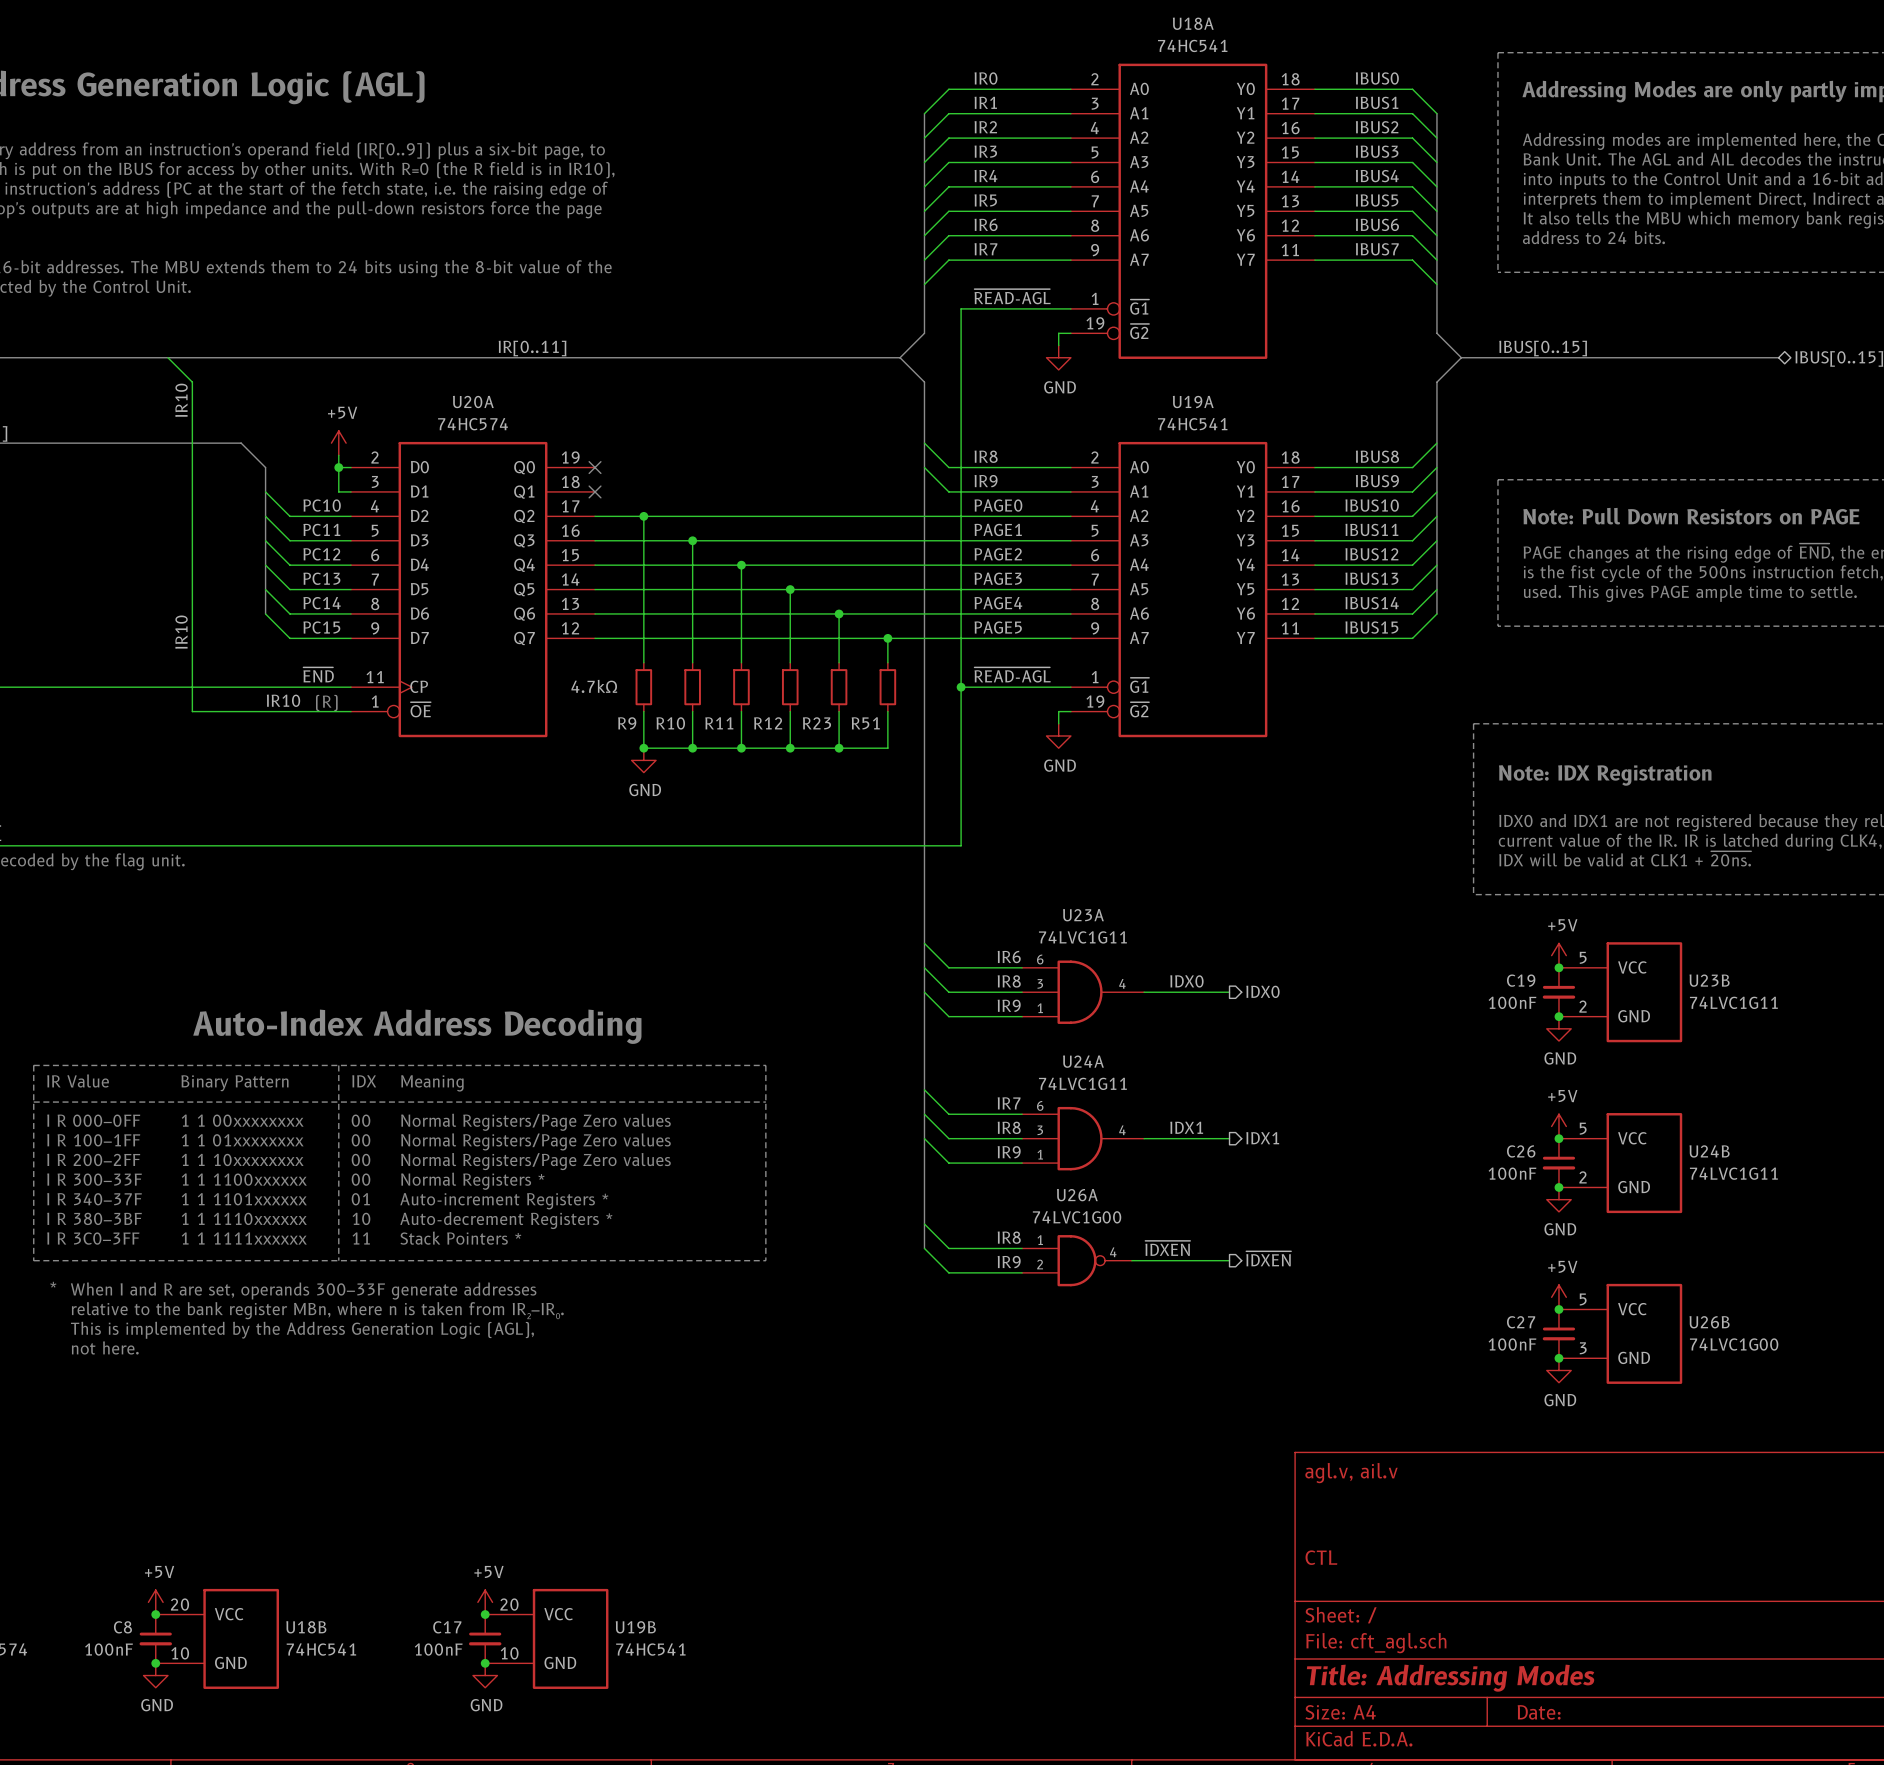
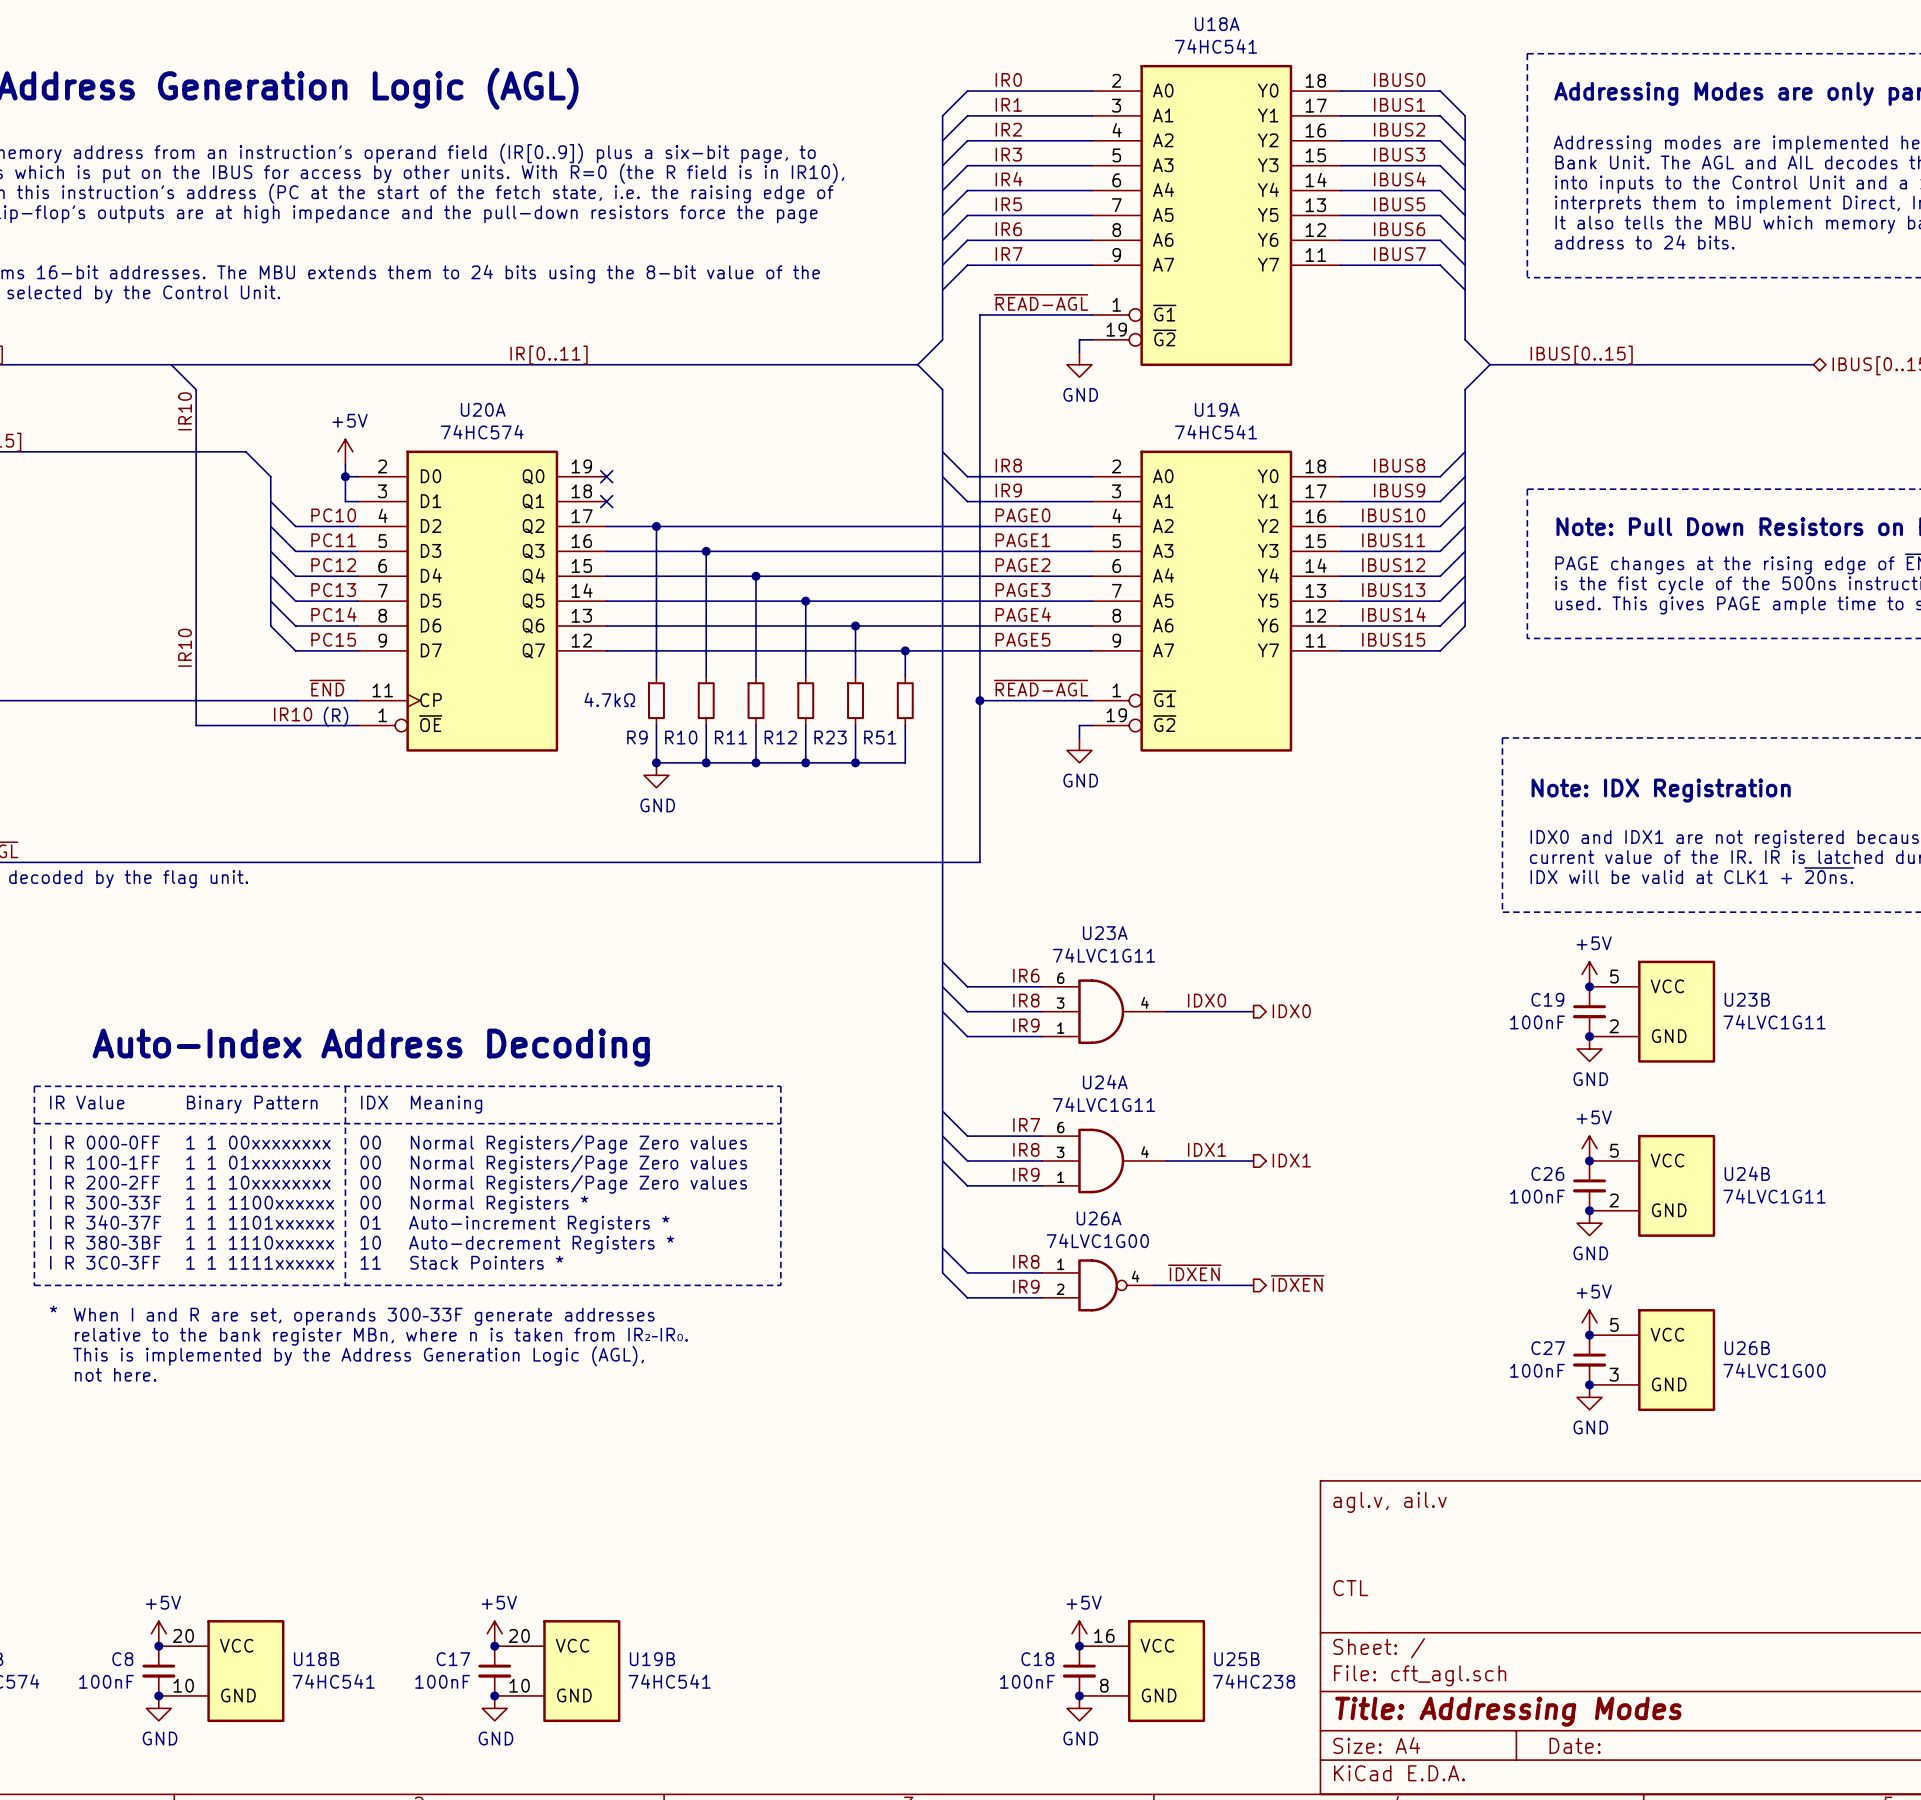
power symbol: none -> +5V (1079, 1633)
junction: none -> (1079, 1646)
C18: none -> 100nF (1079, 1671)
U25B: none -> 74HC238 (1142, 1671)
junction: none -> (1079, 1695)
power symbol: none -> GND (1079, 1708)

